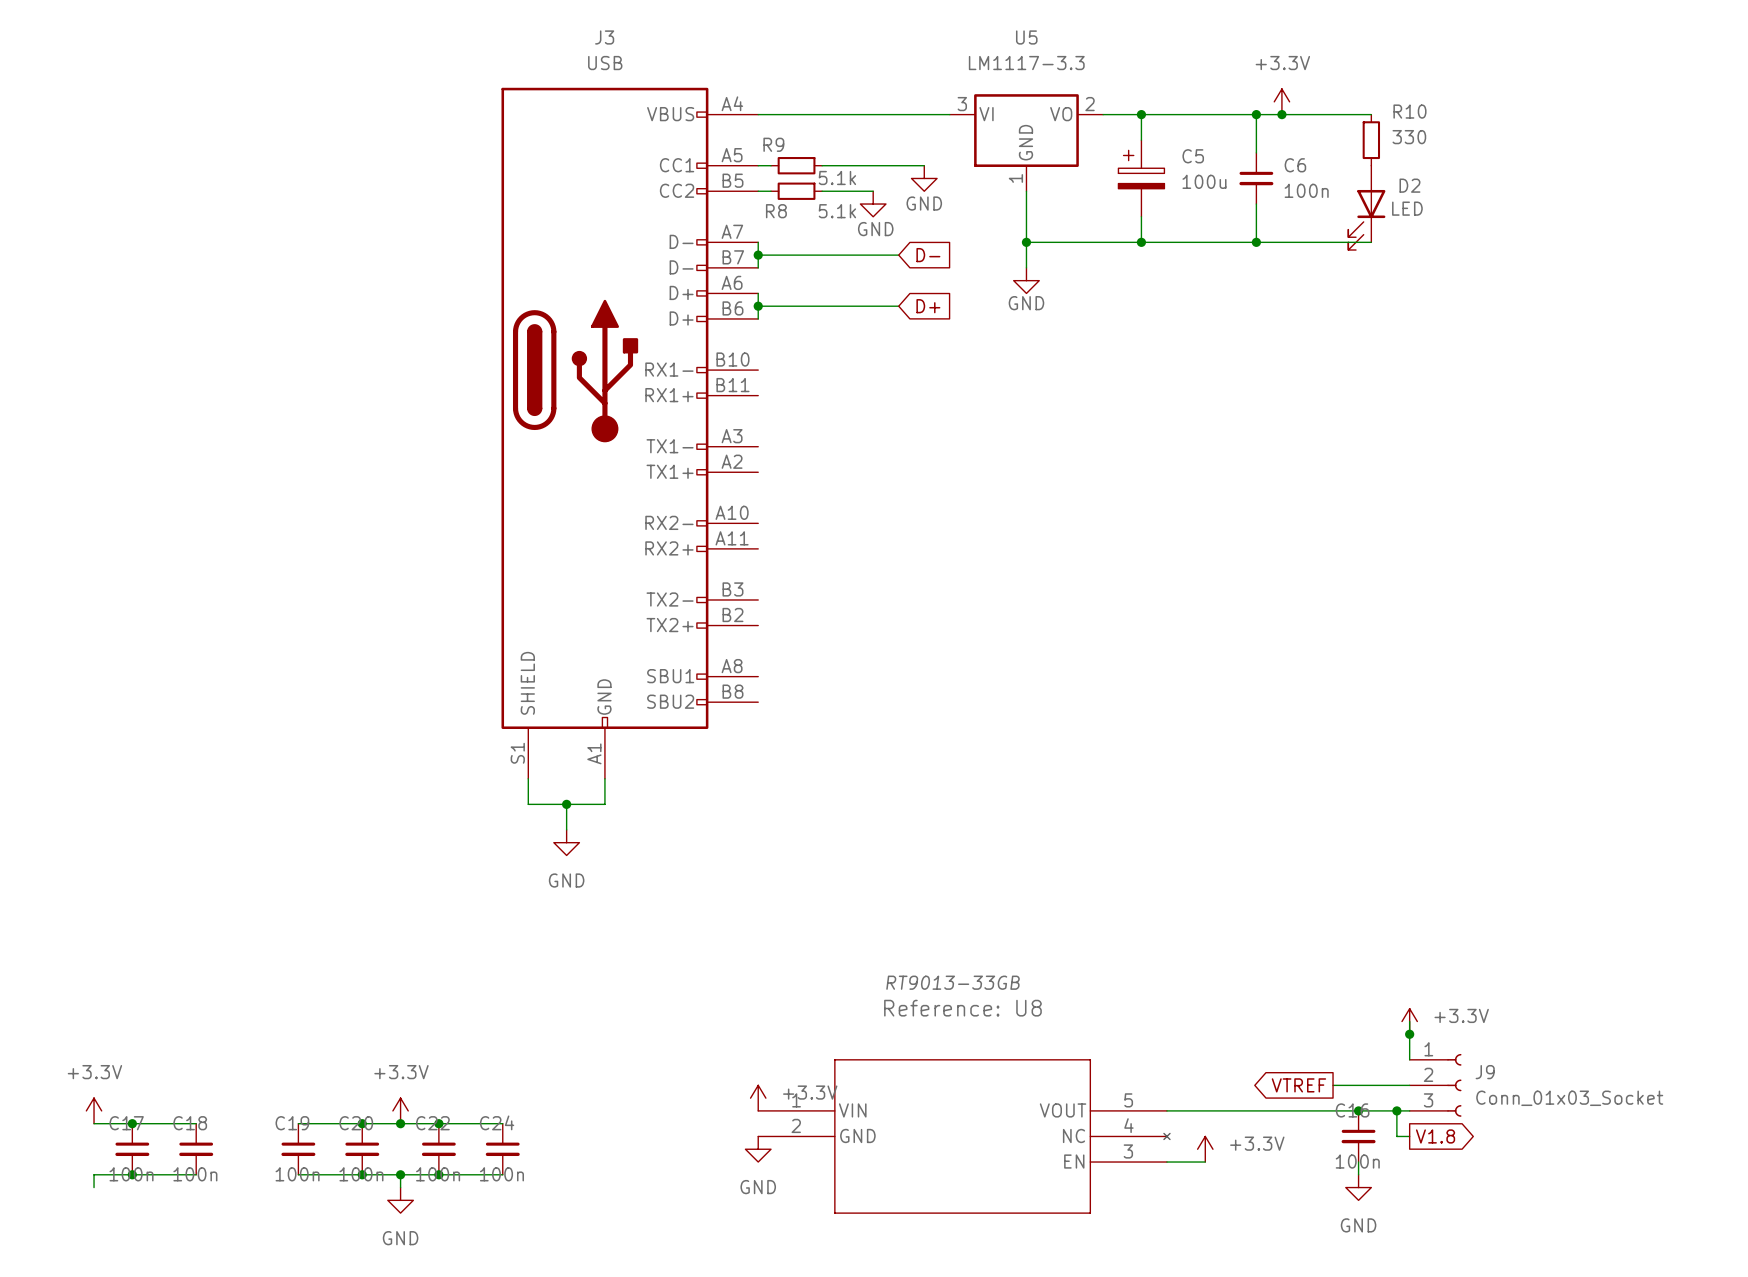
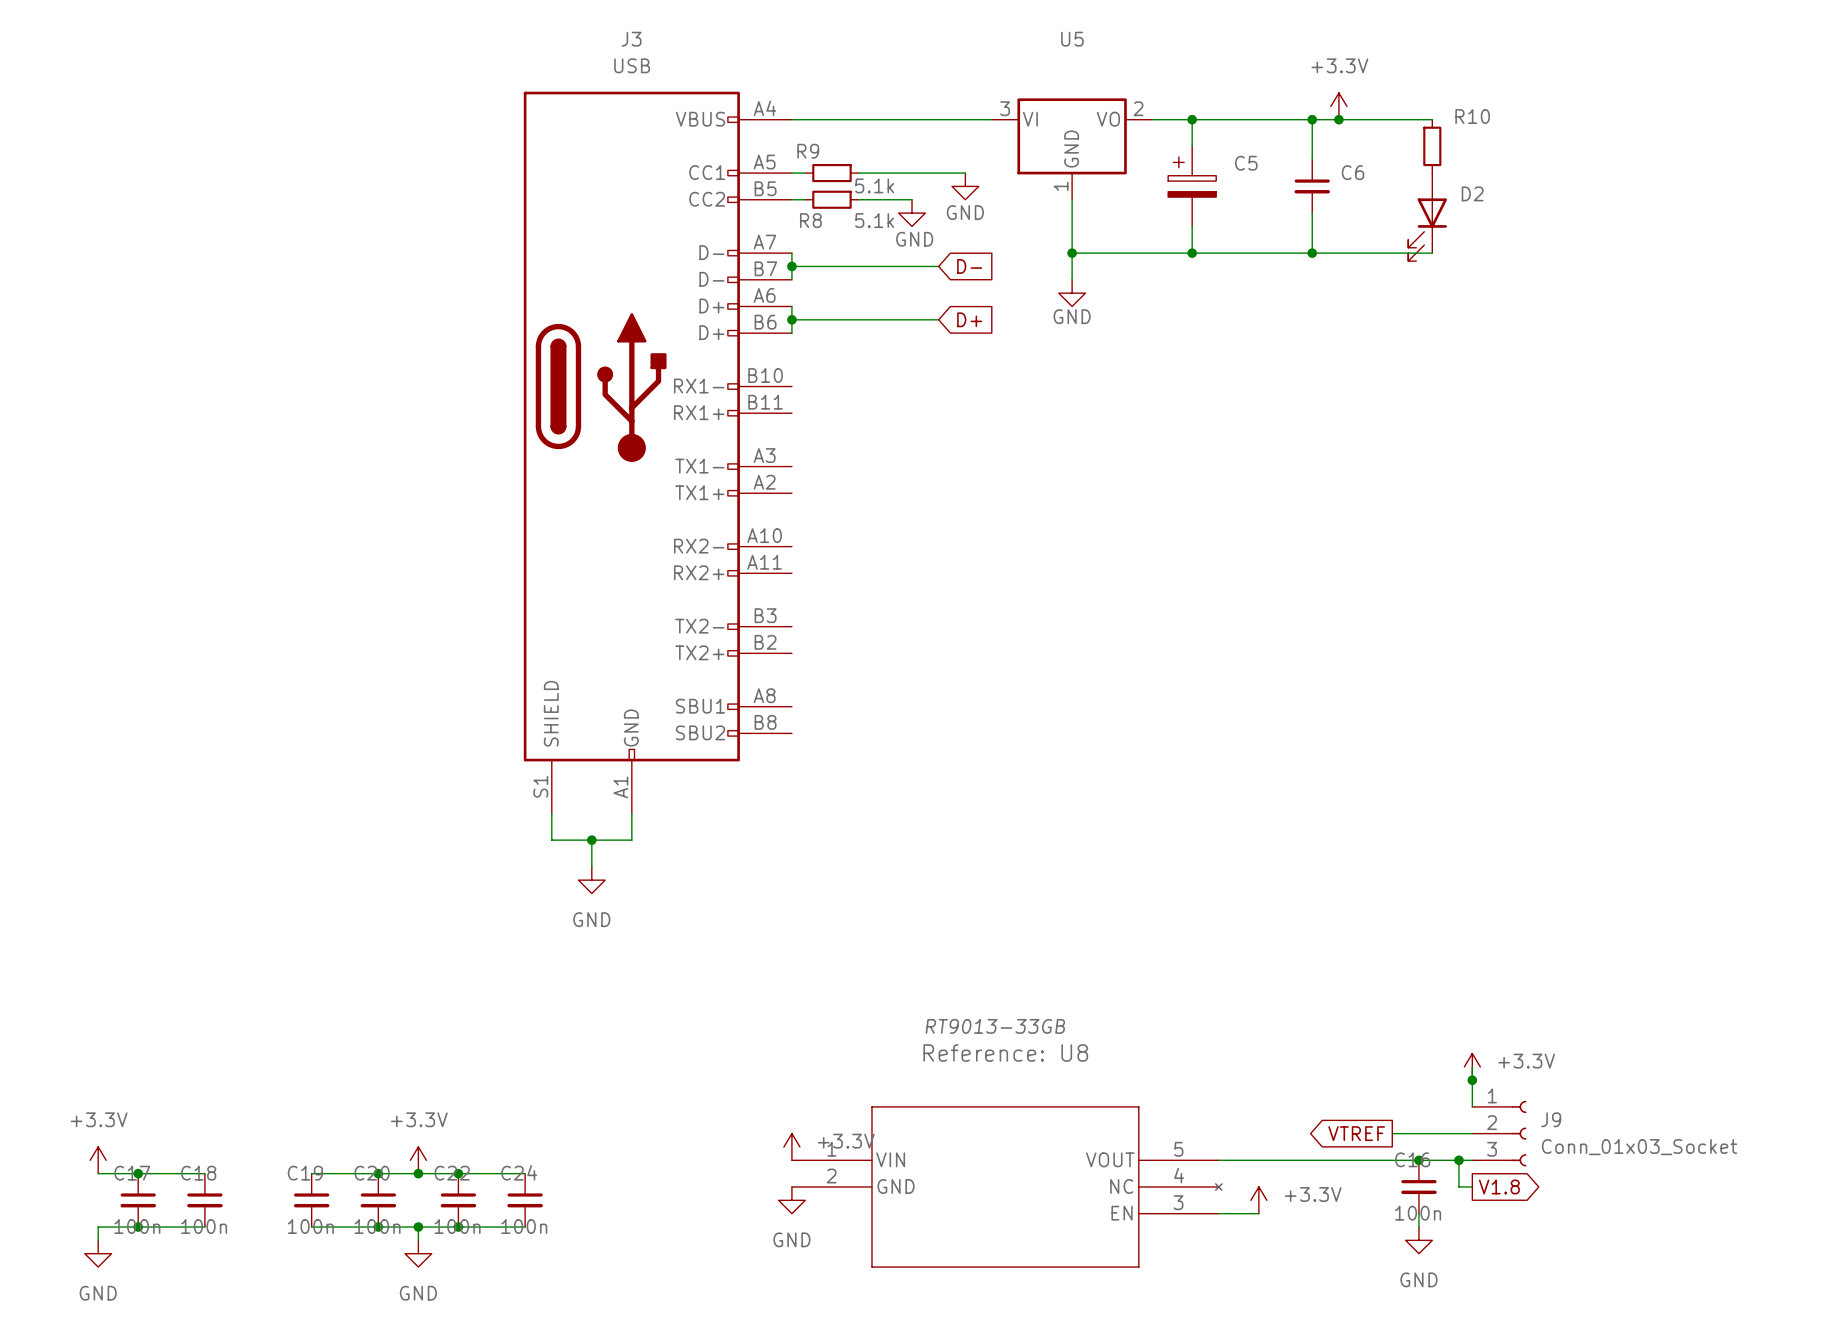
U5 value: LM1117-3.3 (1026, 63) -> none
R10 value: 330 (1409, 137) -> none
C5 value: 100u (1204, 181) -> none
C6 value: 100n (1306, 190) -> none
D2 value: LED (1407, 208) -> none
power symbol: none -> GND (98, 1253)

